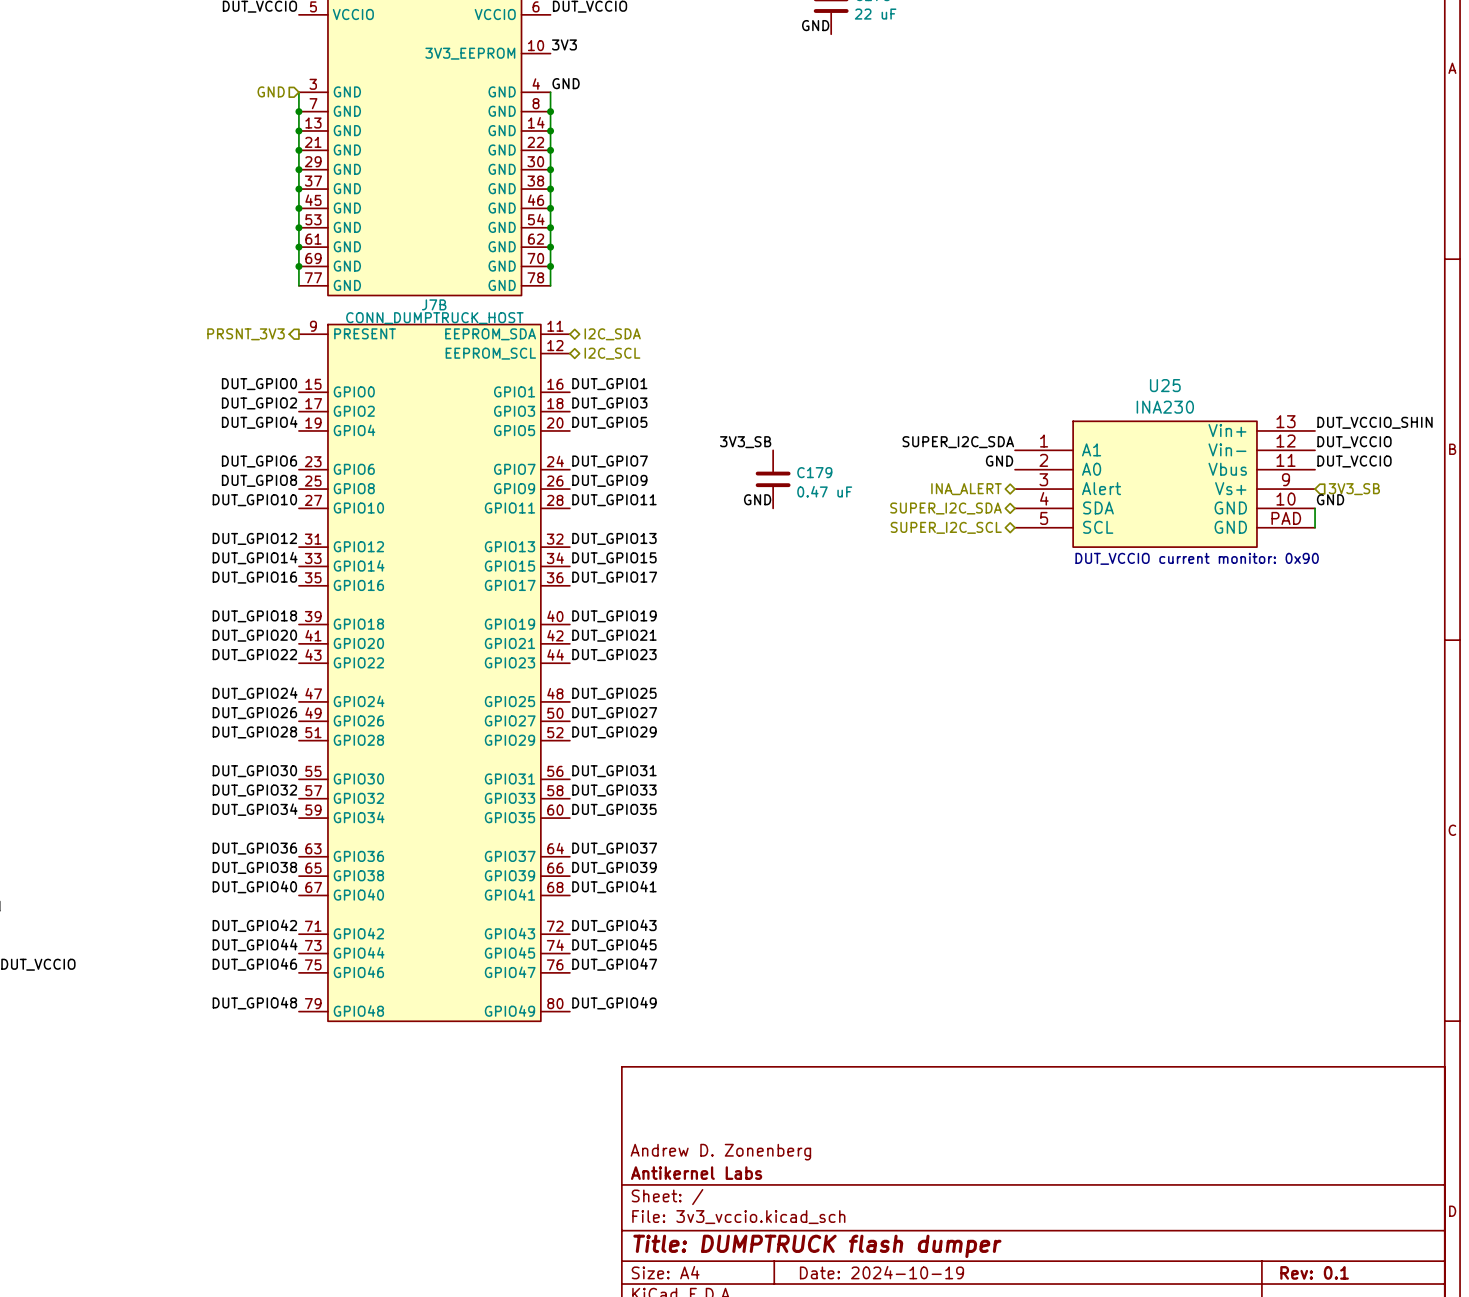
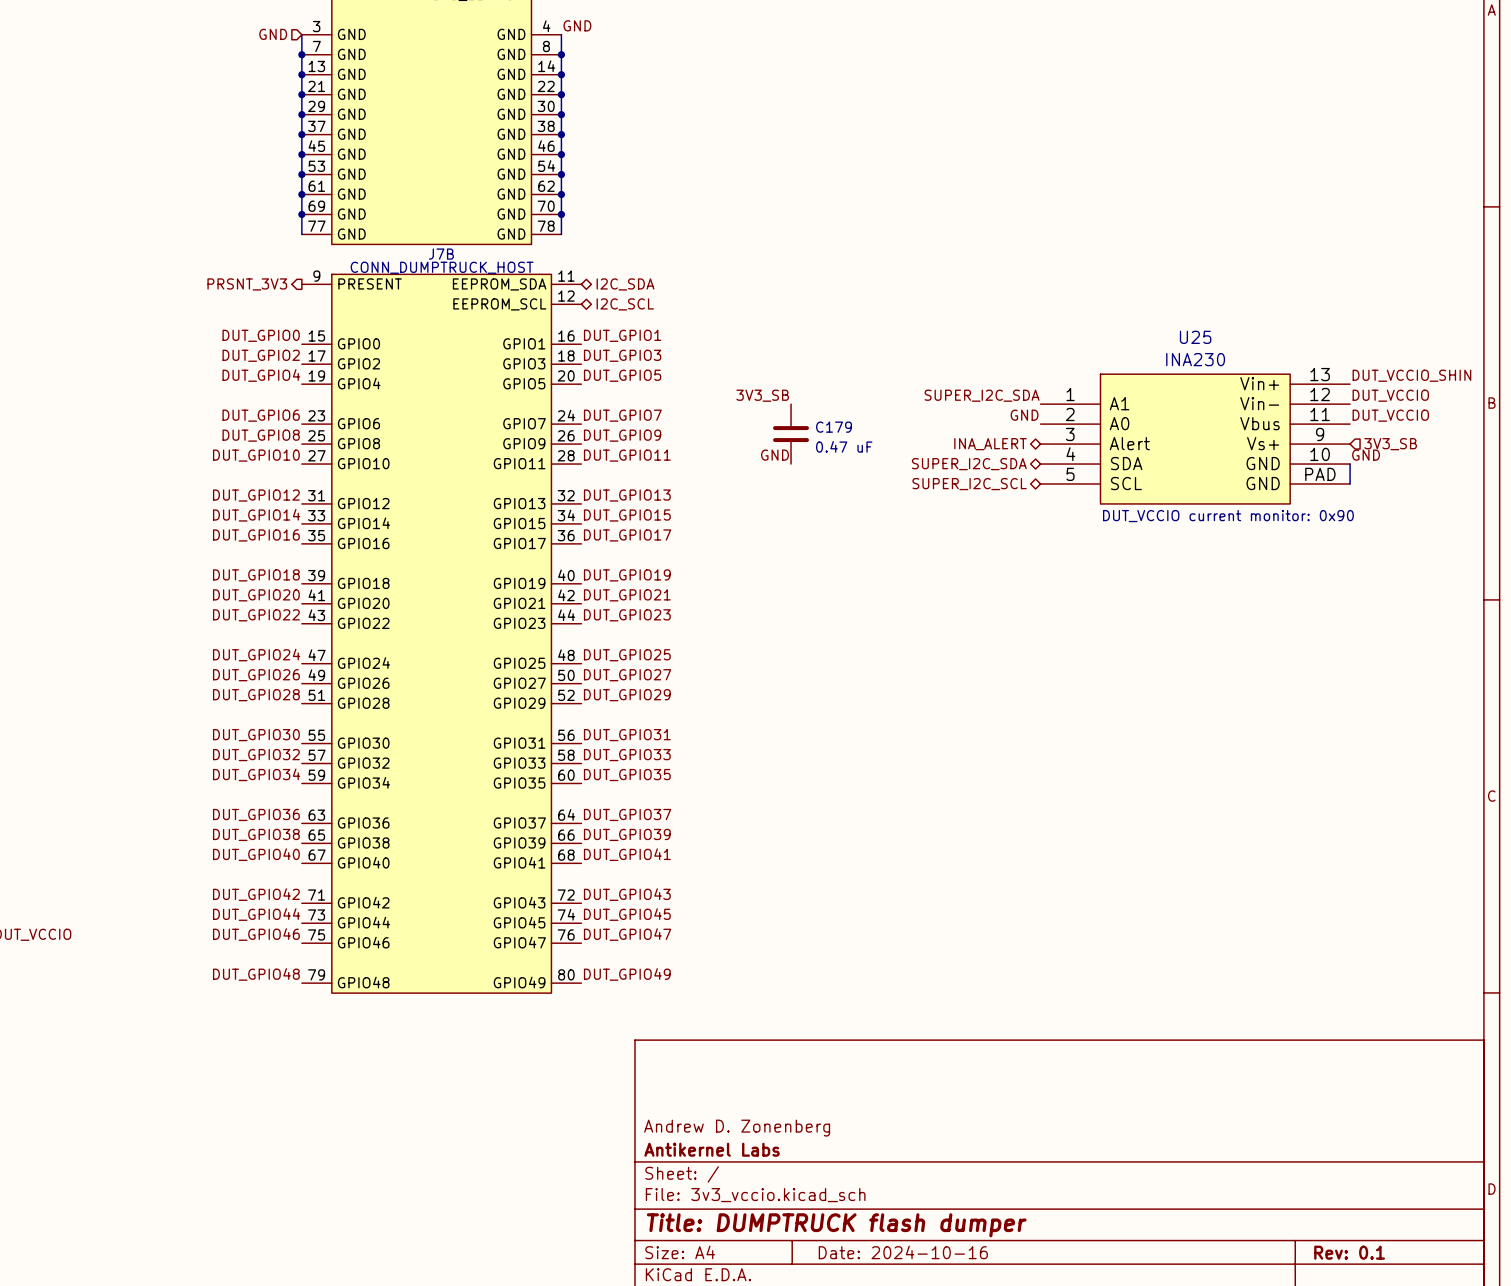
title block: Date: 2024-10-19 (881, 1272) -> Date: 2024-10-16 (903, 1252)

